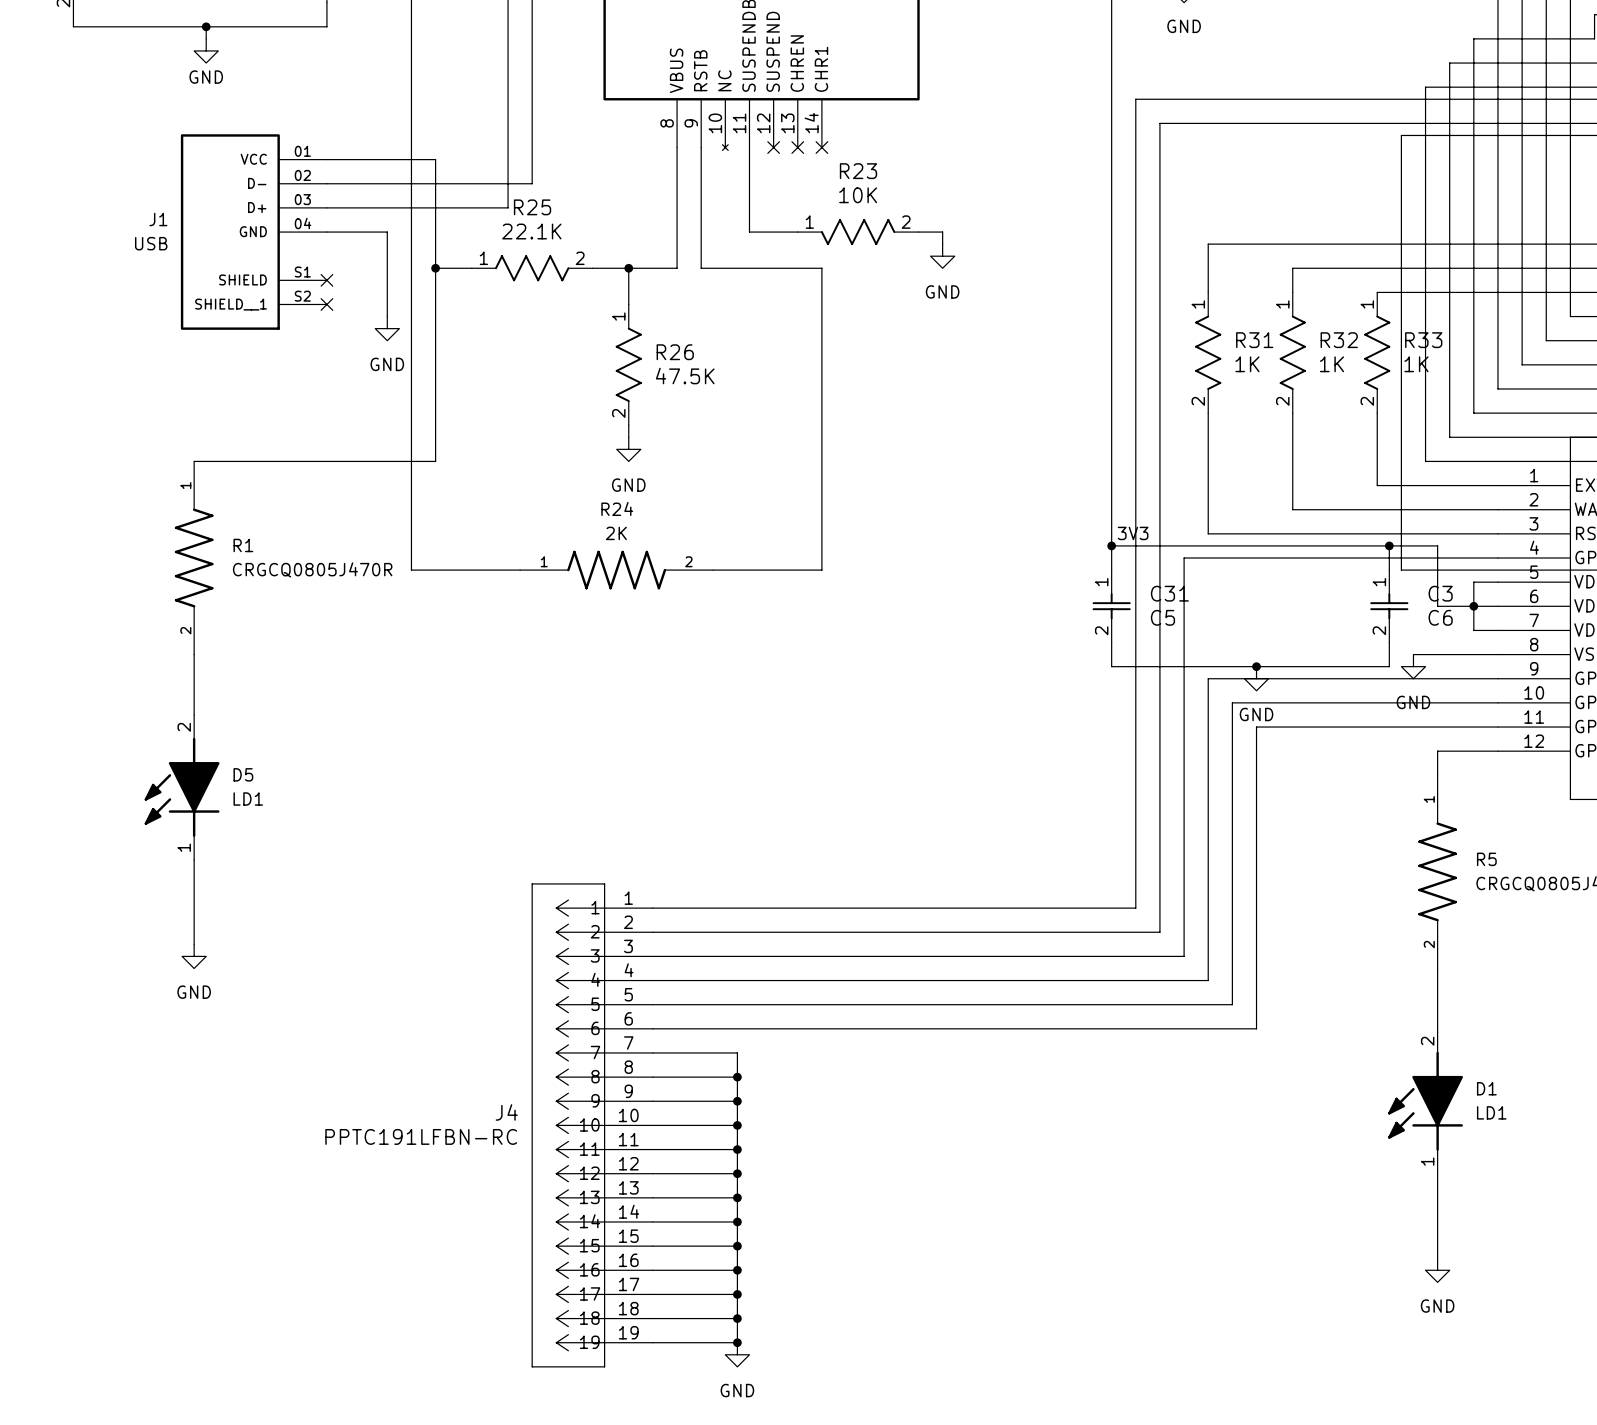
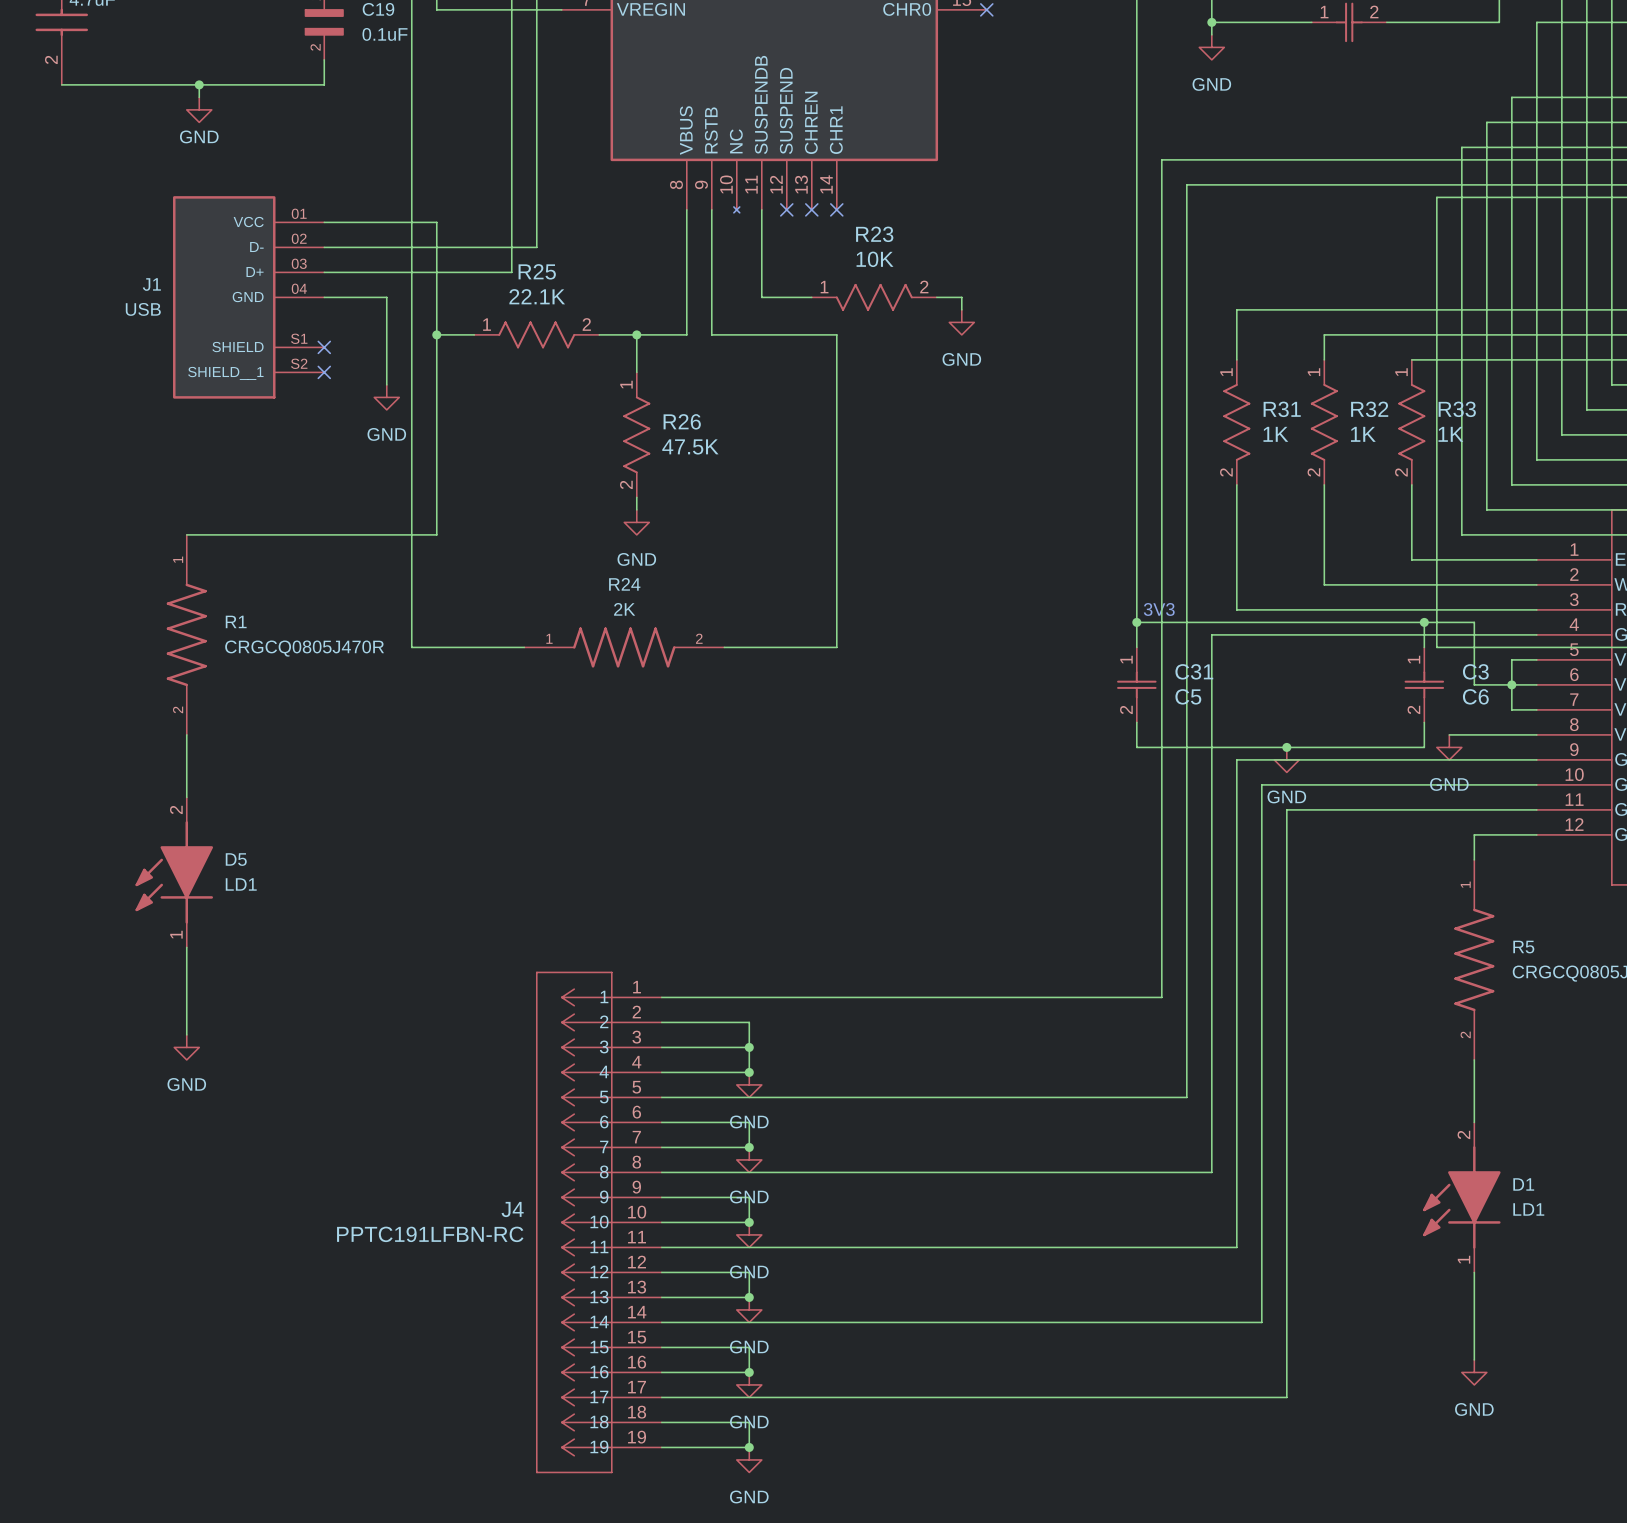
wire: (737, 932) (1159, 932) -> (749, 1022) (749, 1072)
wire: (737, 956) (1184, 956) -> (749, 1172) (1211, 1172) (1211, 1047)
junction: none -> (749, 1047)
wire: (737, 980) (1208, 980) -> (749, 1247) (1236, 1247) (1236, 1072)
junction: none -> (749, 1072)
power symbol: none -> GND (749, 1084)
wire: (1159, 1004) (1232, 1004) -> (1186, 1097) (1186, 1022)
wire: none -> (1261, 1097) (1261, 1322) (749, 1322)
wire: (737, 1028) (1256, 1028) -> (749, 1397) (1286, 1397) (1286, 1122)
wire: (737, 1052) (737, 1101) -> (749, 1147) (749, 1122)
junction: none -> (749, 1147)
power symbol: none -> GND (749, 1159)
junction: (737, 1077) -> none
junction: (737, 1101) -> none
wire: (737, 1125) (737, 1173) -> none
power symbol: none -> GND (749, 1234)
junction: (737, 1149) -> none
junction: (737, 1173) -> none
wire: (737, 1197) (737, 1246) -> none
power symbol: none -> GND (749, 1309)
junction: (737, 1221) -> none
junction: (737, 1246) -> none
wire: (737, 1270) (737, 1318) -> none
power symbol: none -> GND (749, 1384)
junction: (737, 1294) -> none
junction: (737, 1318) -> none

